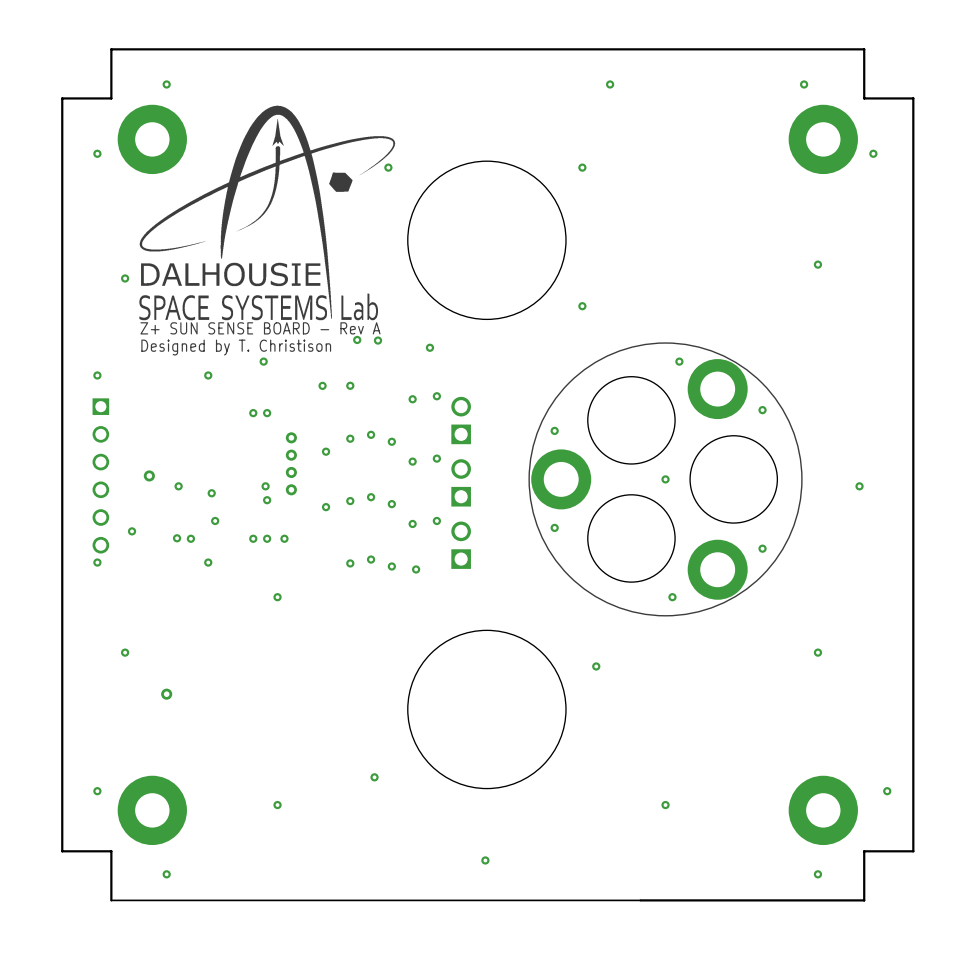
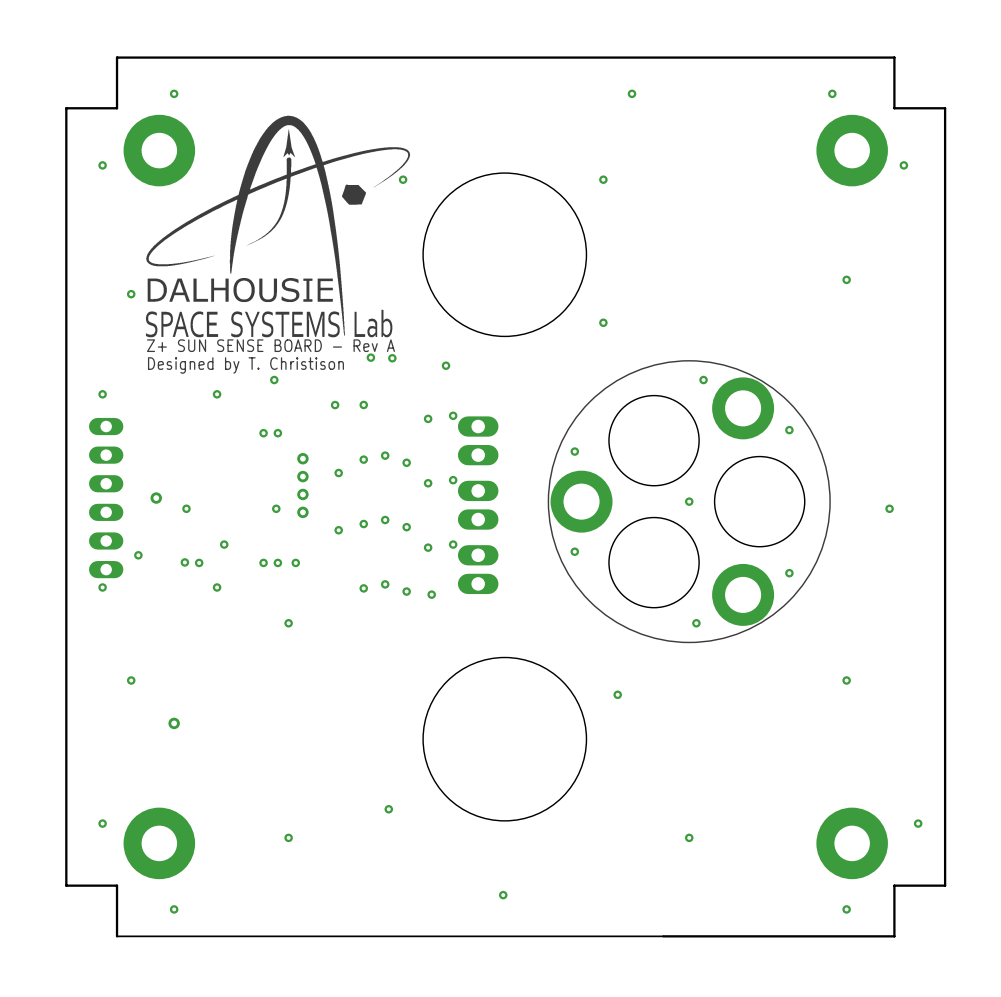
part footprint: [451, 396, 471, 445] -> [457, 416, 499, 466]
part footprint: [92, 398, 110, 554] -> [89, 417, 124, 579]
part footprint: [451, 459, 471, 507] -> [457, 480, 499, 530]
via: (211, 493) -> none
via: (267, 500) -> none
part footprint: [451, 521, 471, 569] -> [457, 545, 499, 595]

